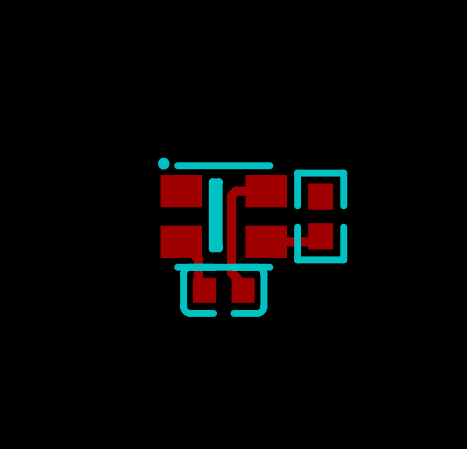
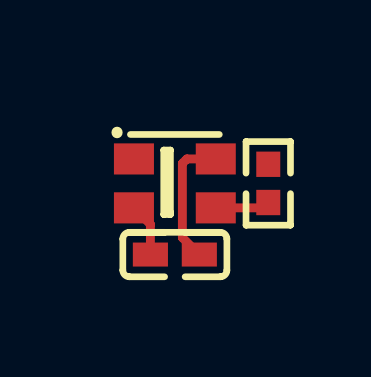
part footprint: [180, 263, 268, 317] -> [119, 228, 231, 281]

